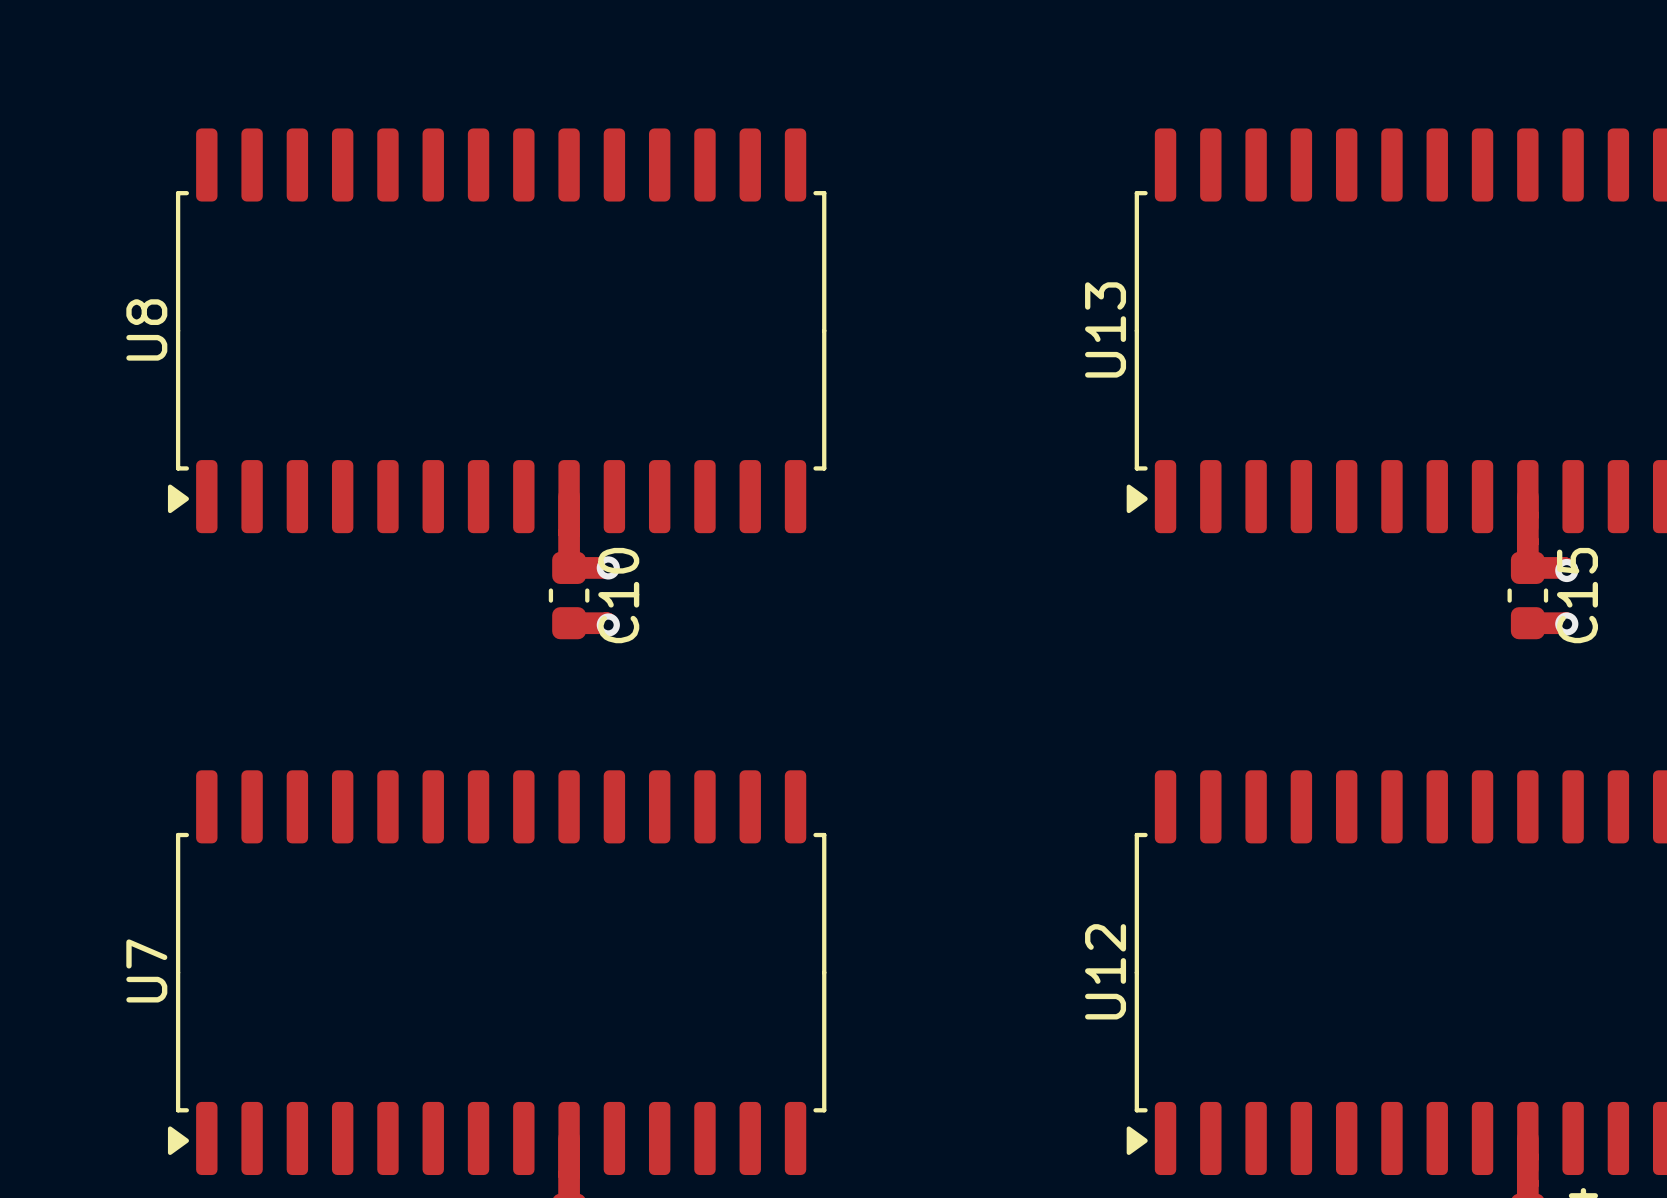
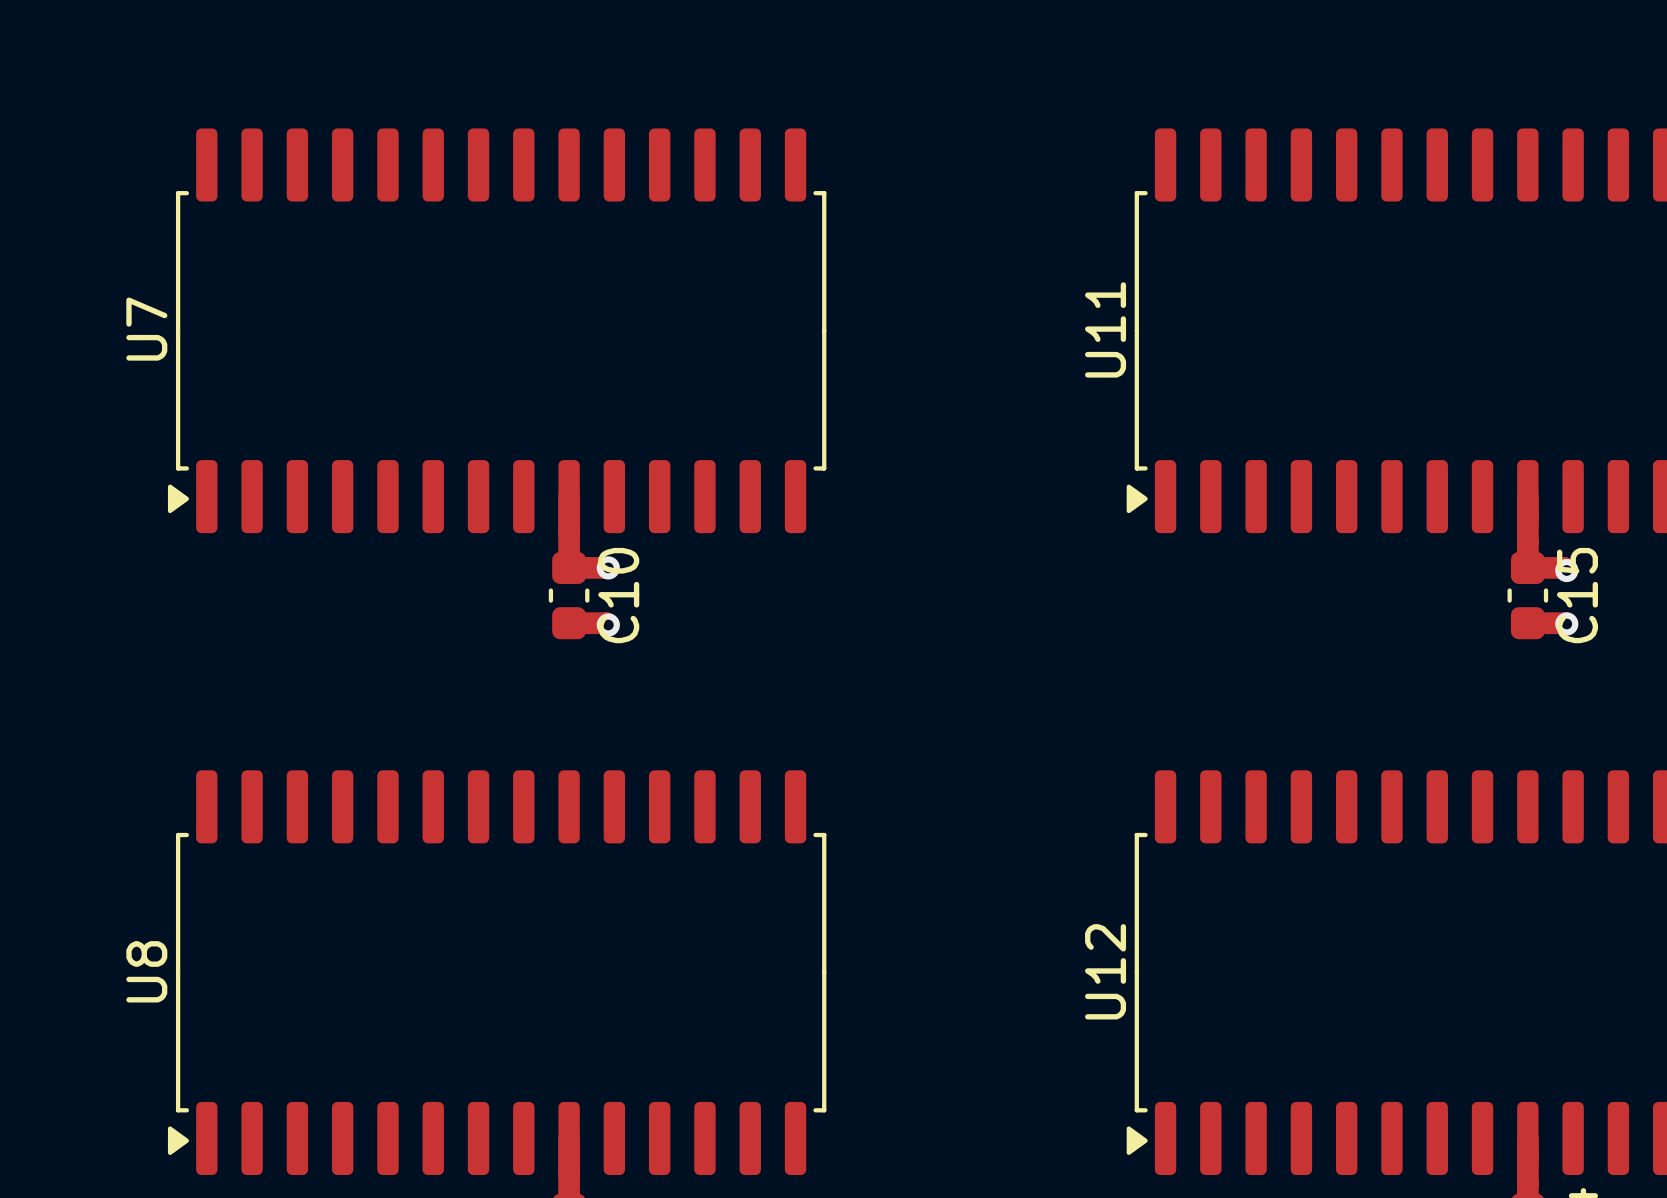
U8 name: U8 (146, 329) -> U7 (146, 329)
U13 name: U13 (1105, 329) -> U11 (1105, 329)
U7 name: U7 (146, 970) -> U8 (146, 971)

